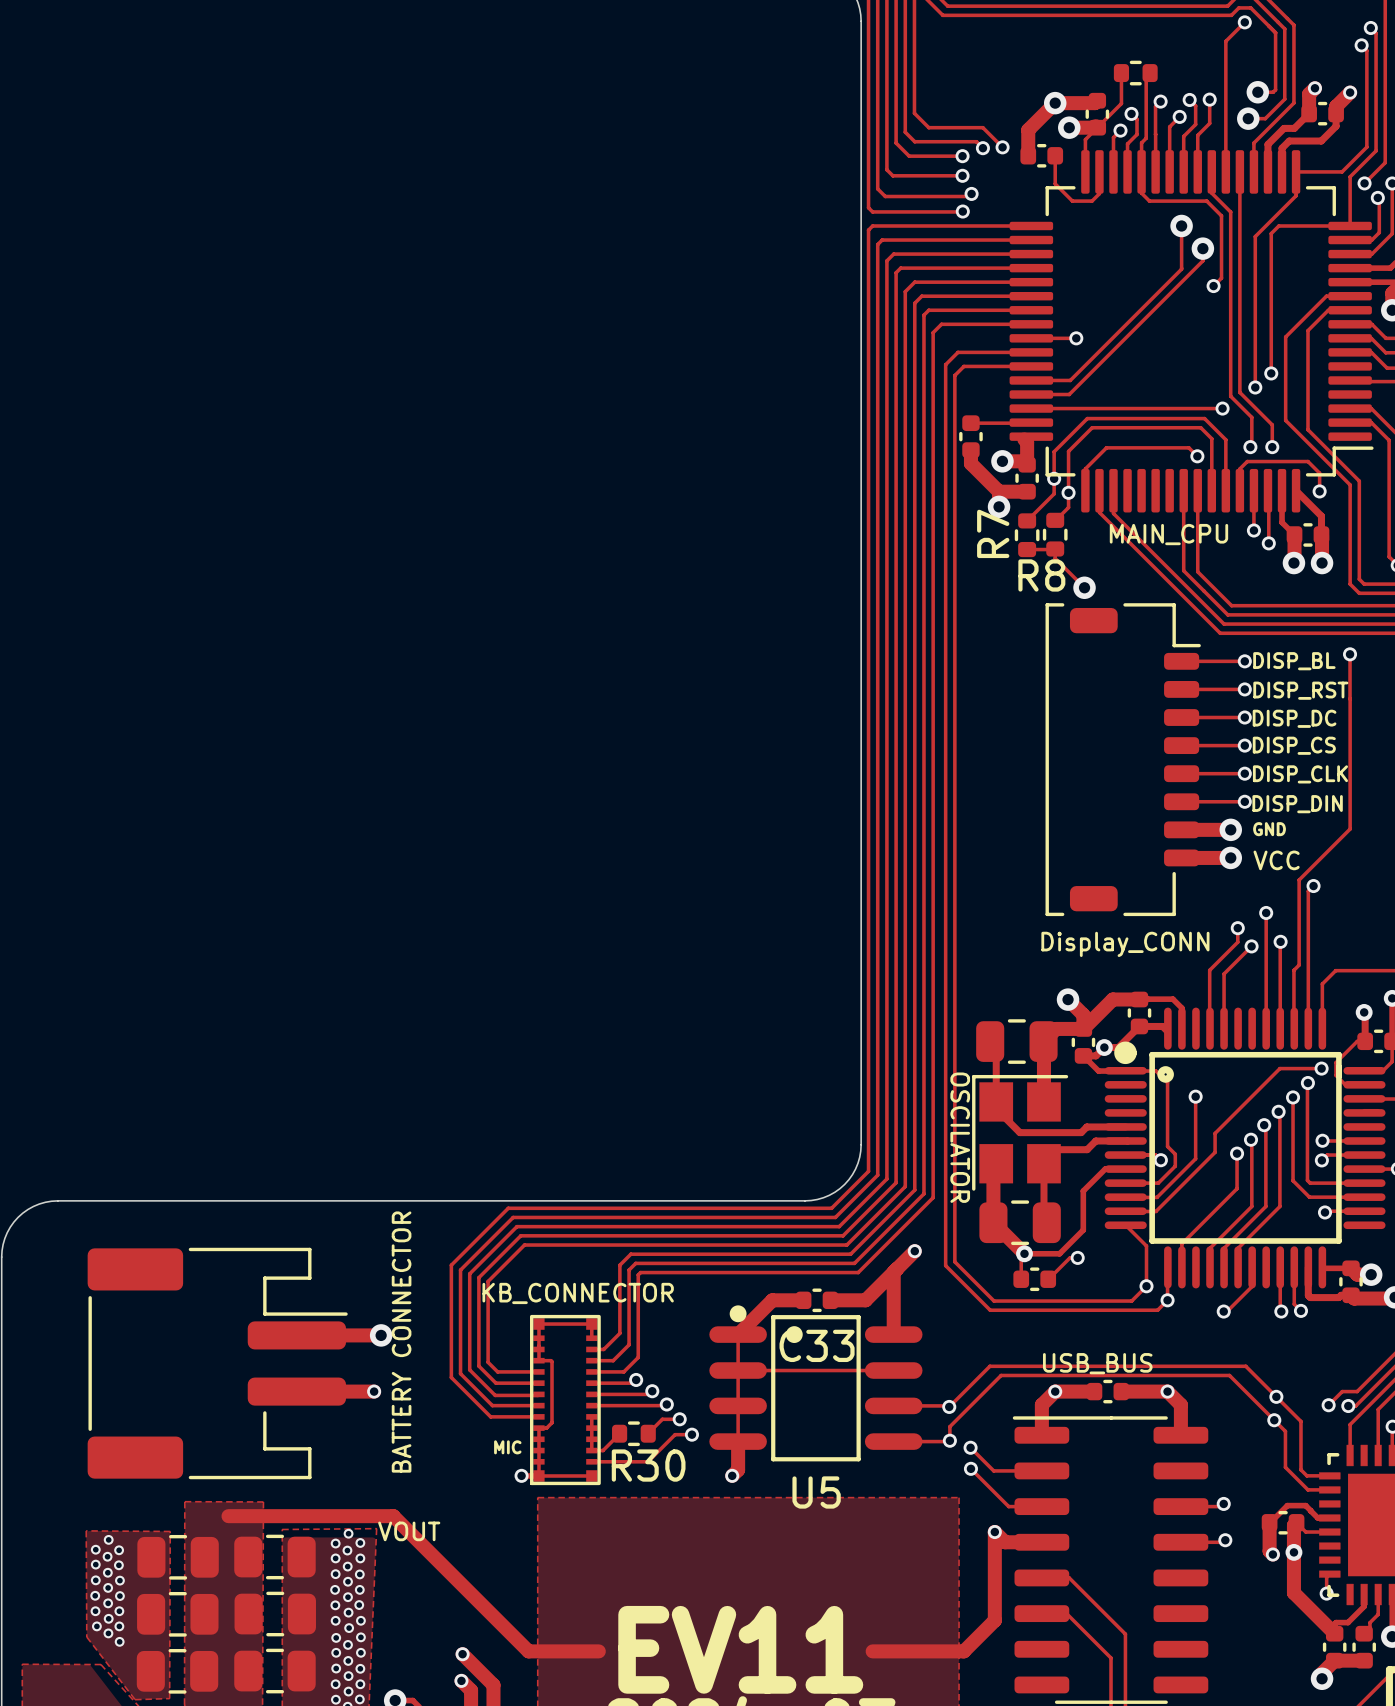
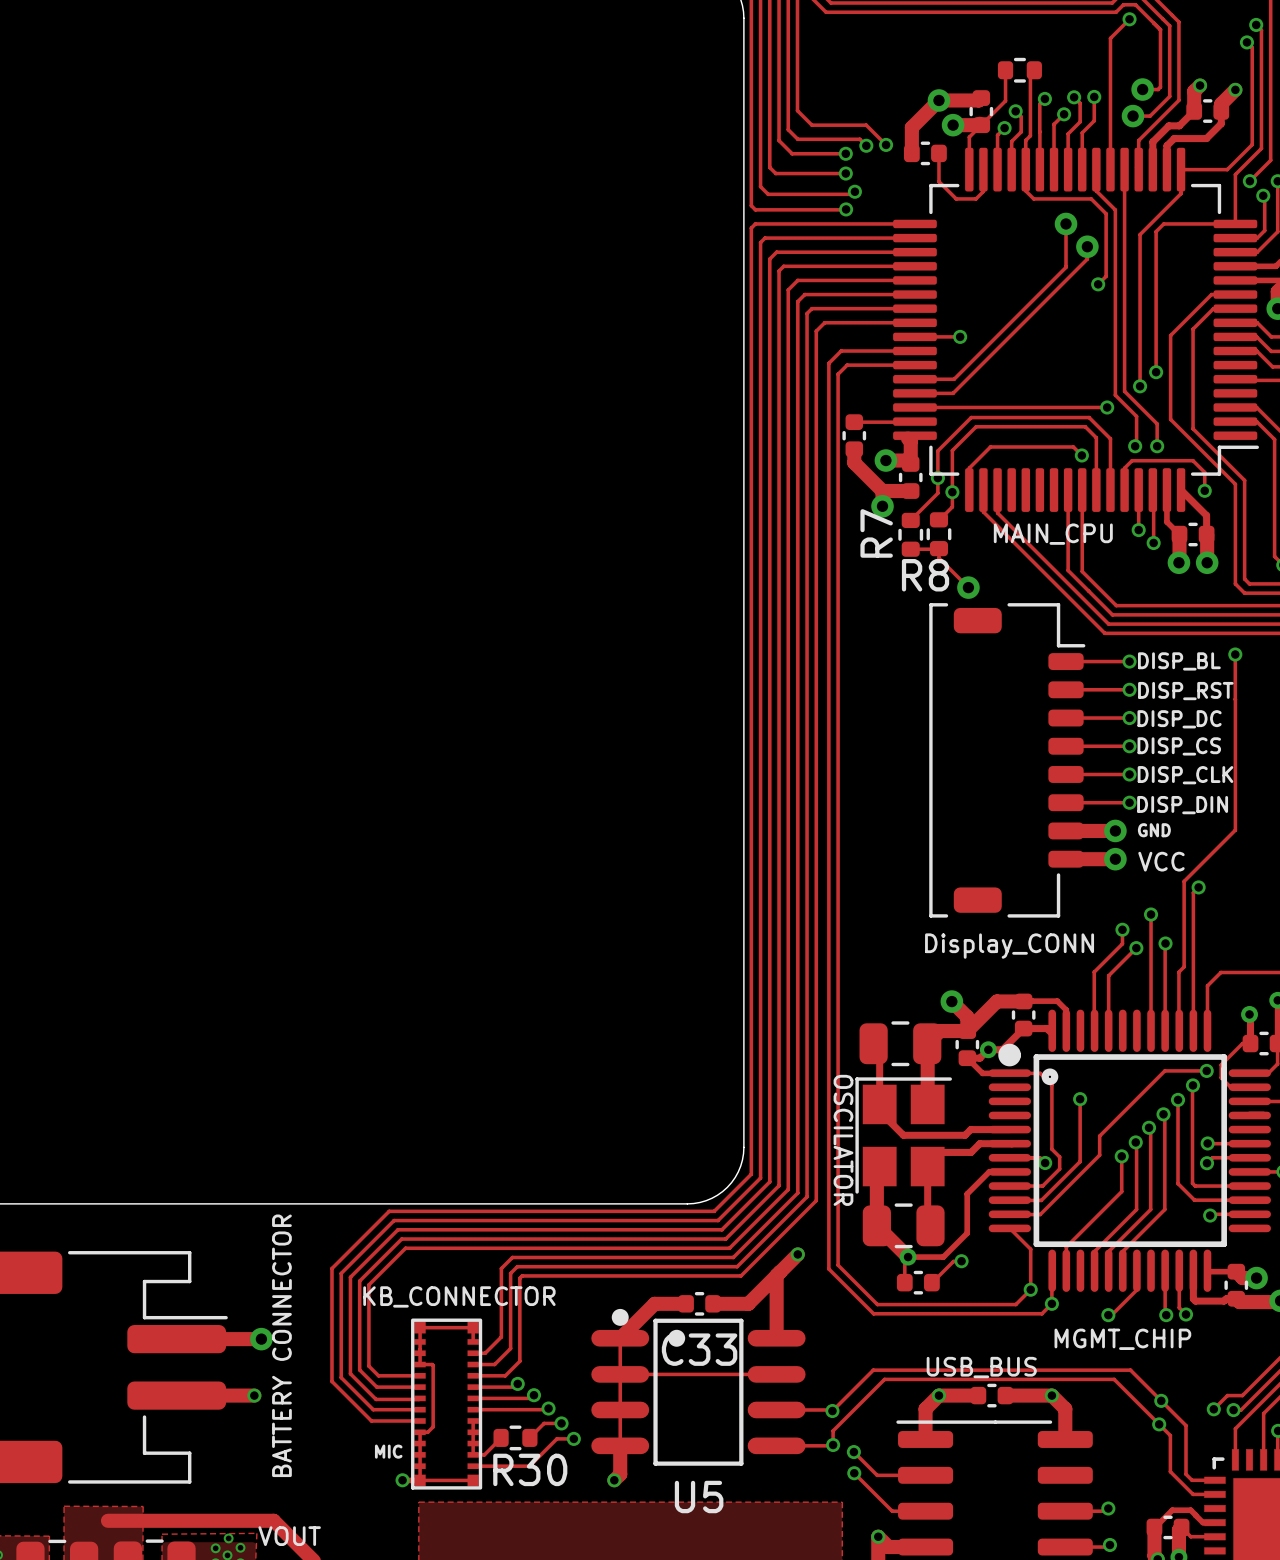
text: none -> MGMT_CHIP (1122, 1339)

